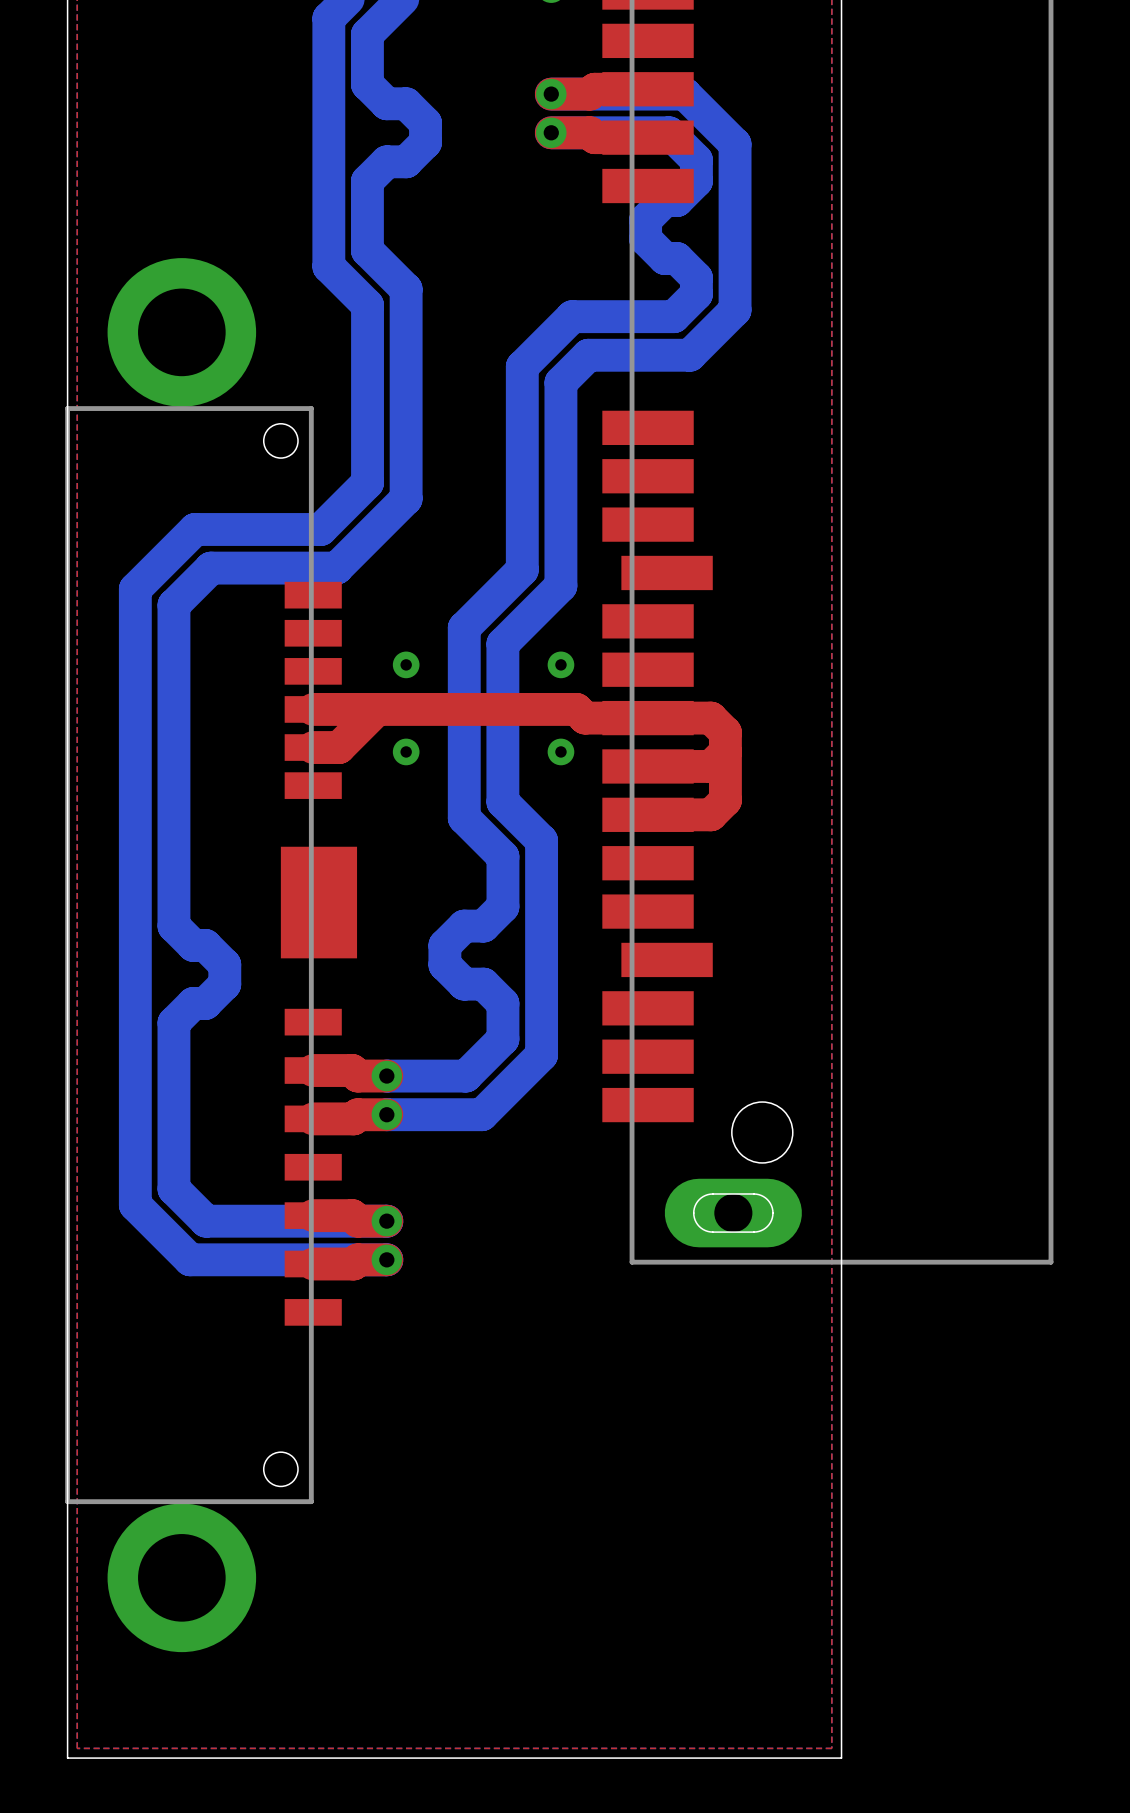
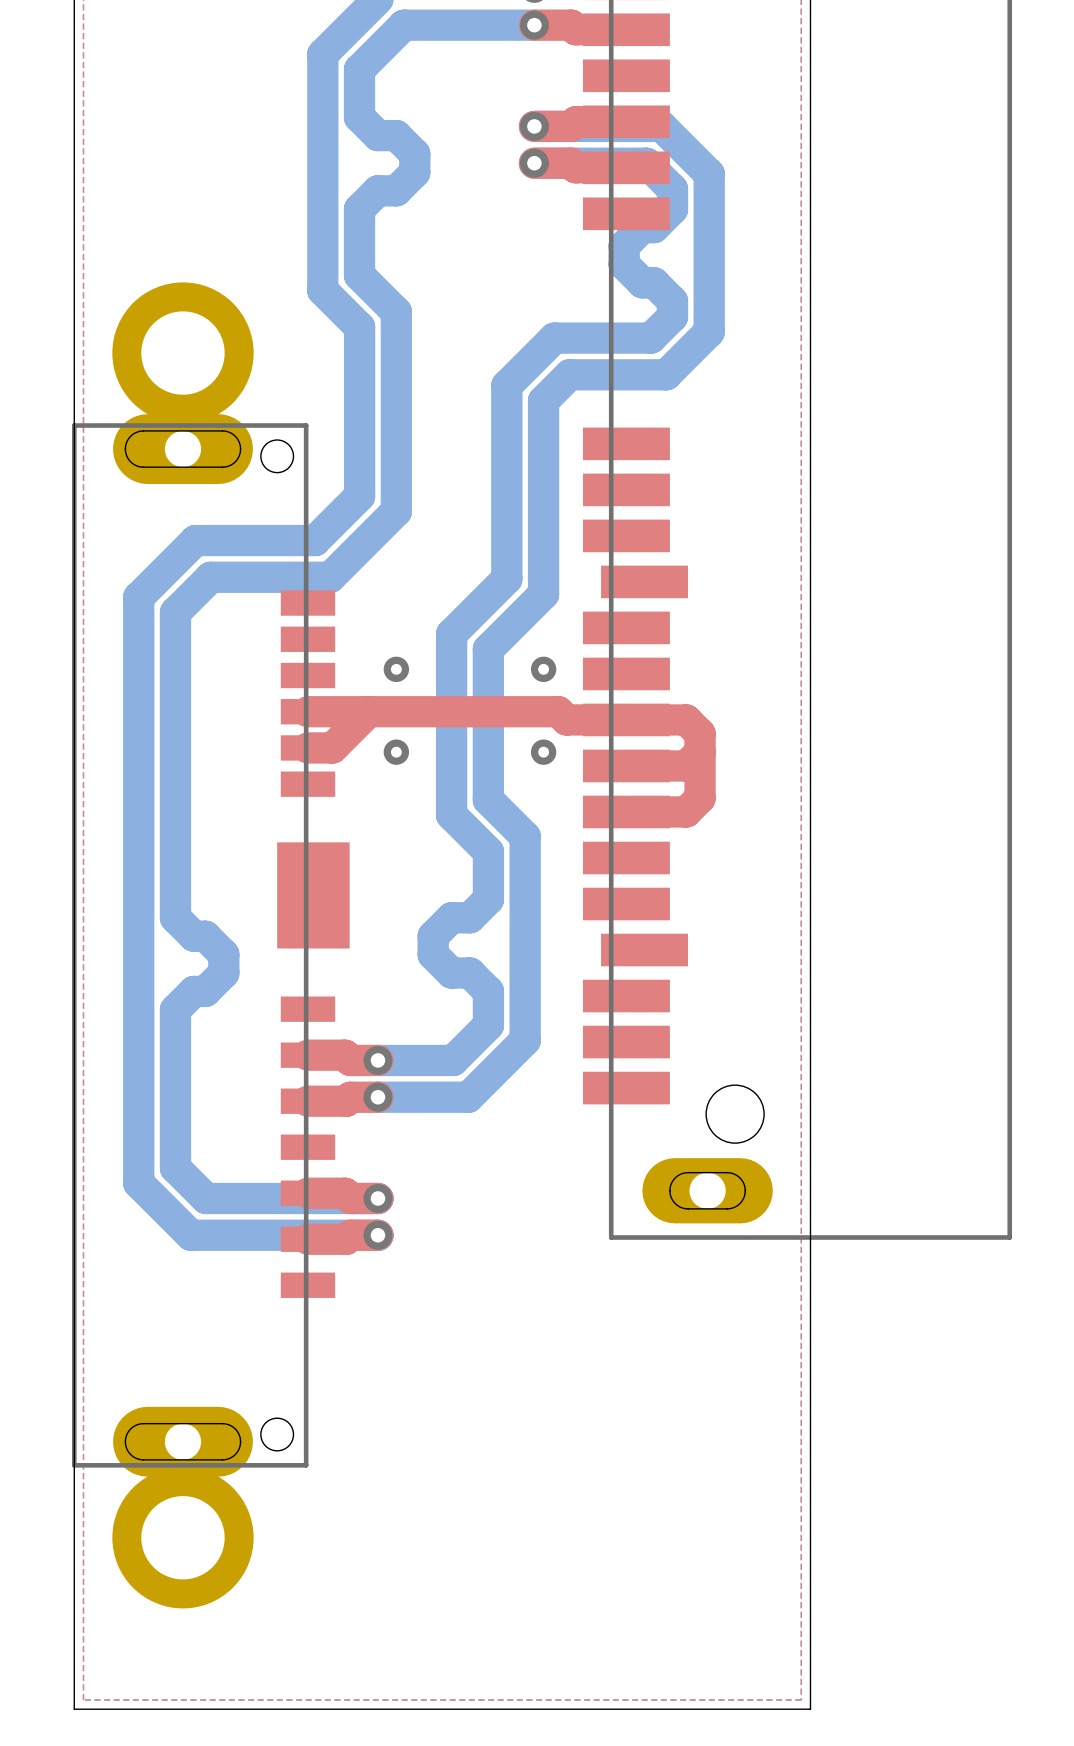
part footprint: [65, 258, 358, 1653] -> [71, 282, 350, 1609]

